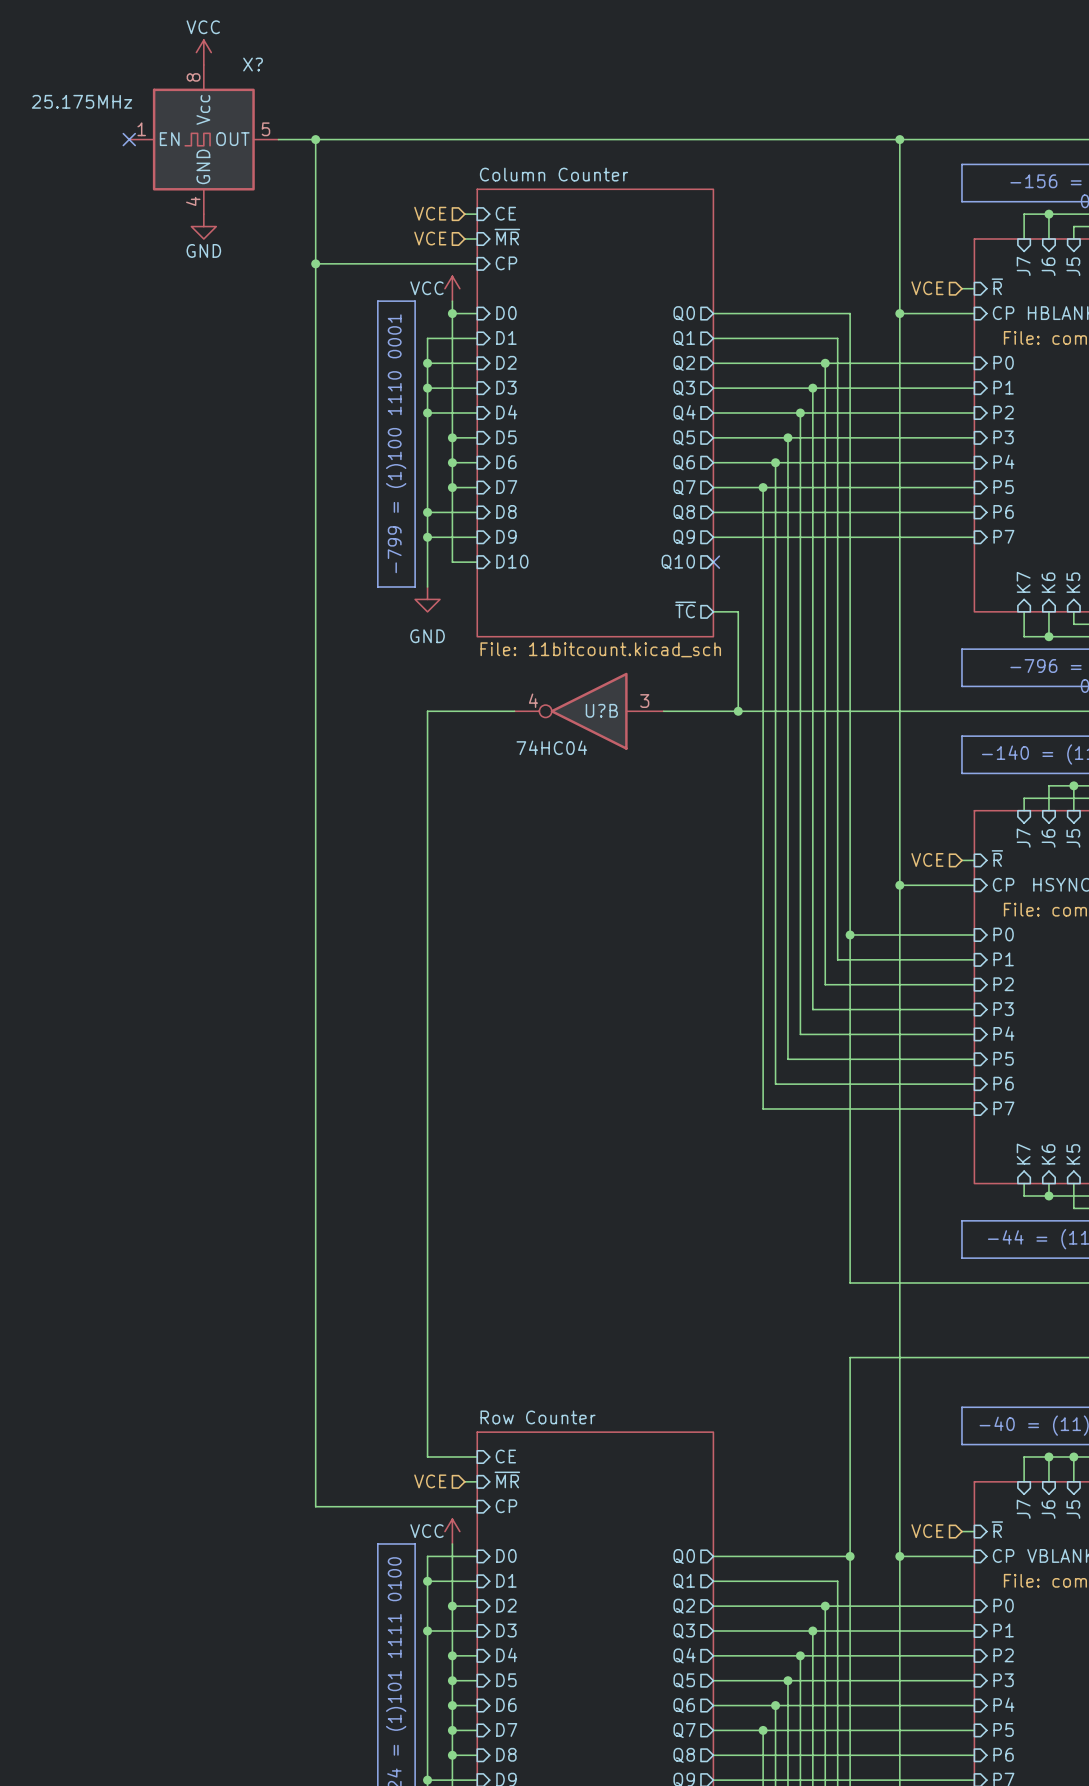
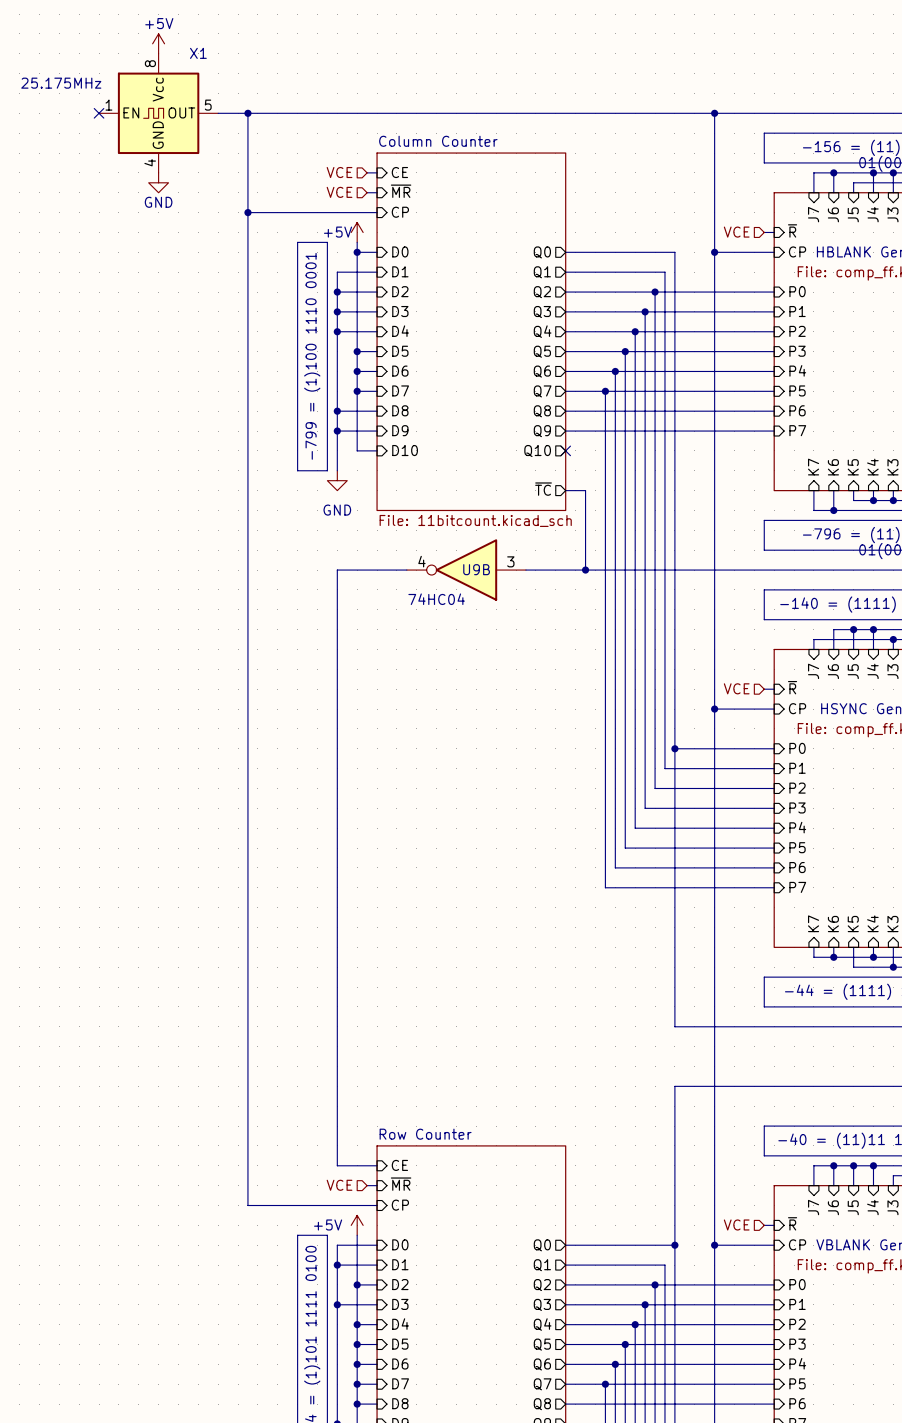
power symbol: VCC (203, 52) -> +5V (158, 43)
X? name: X? (253, 64) -> X1 (198, 53)
power symbol: VCC (452, 288) -> +5V (357, 232)
U?B name: U?B (601, 710) -> U9B (476, 569)
power symbol: VCC (452, 1531) -> +5V (357, 1225)

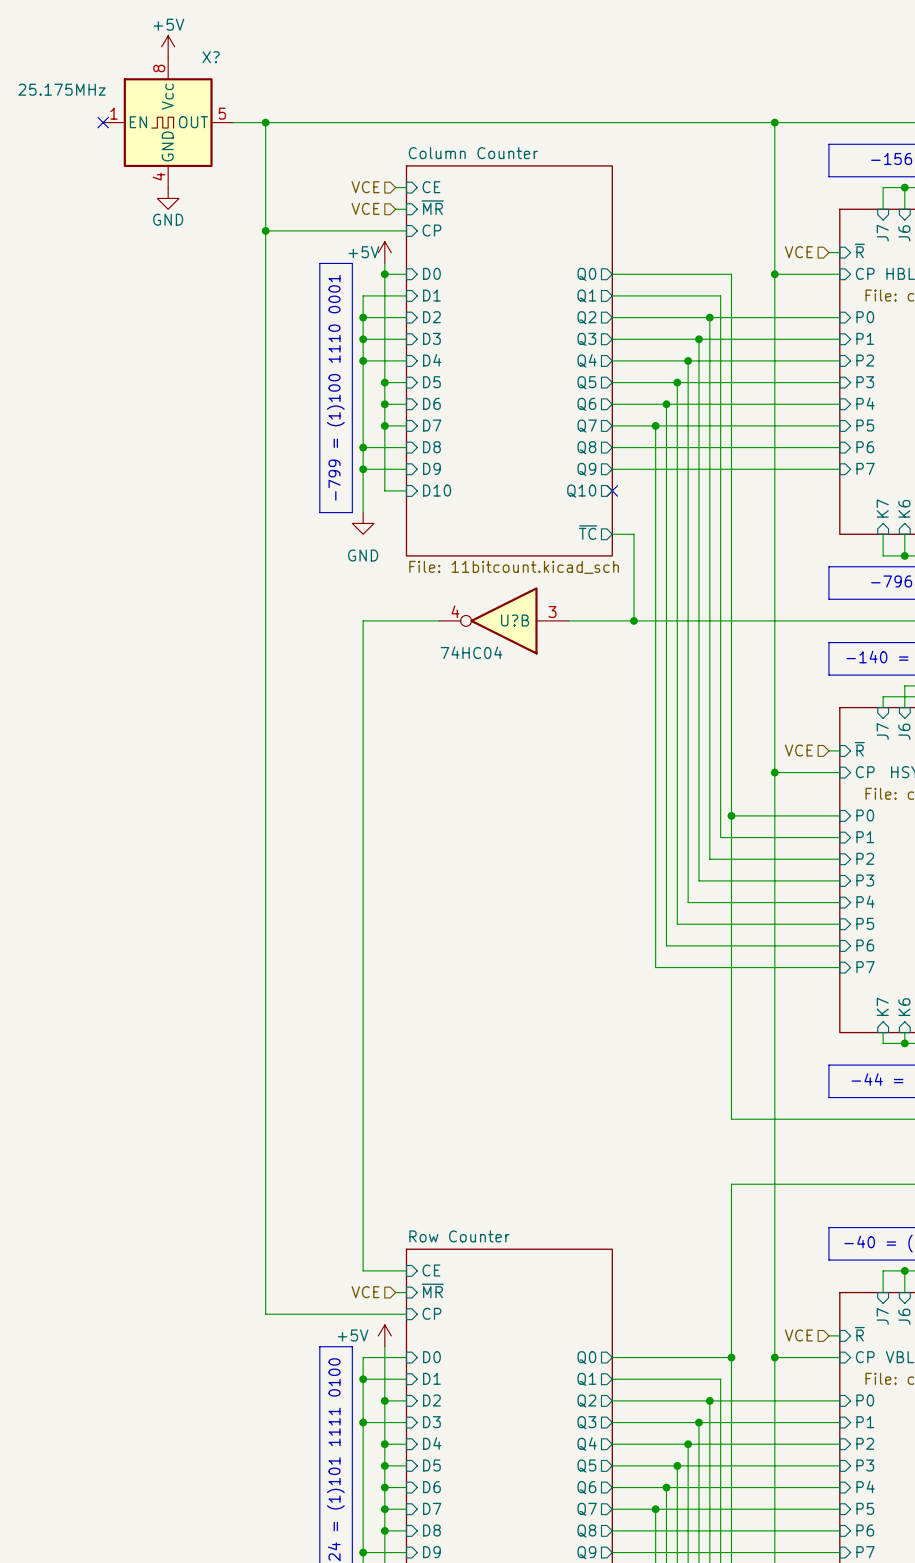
X1 name: X1 (198, 53) -> X? (211, 57)
U9B name: U9B (476, 569) -> U?B (515, 620)

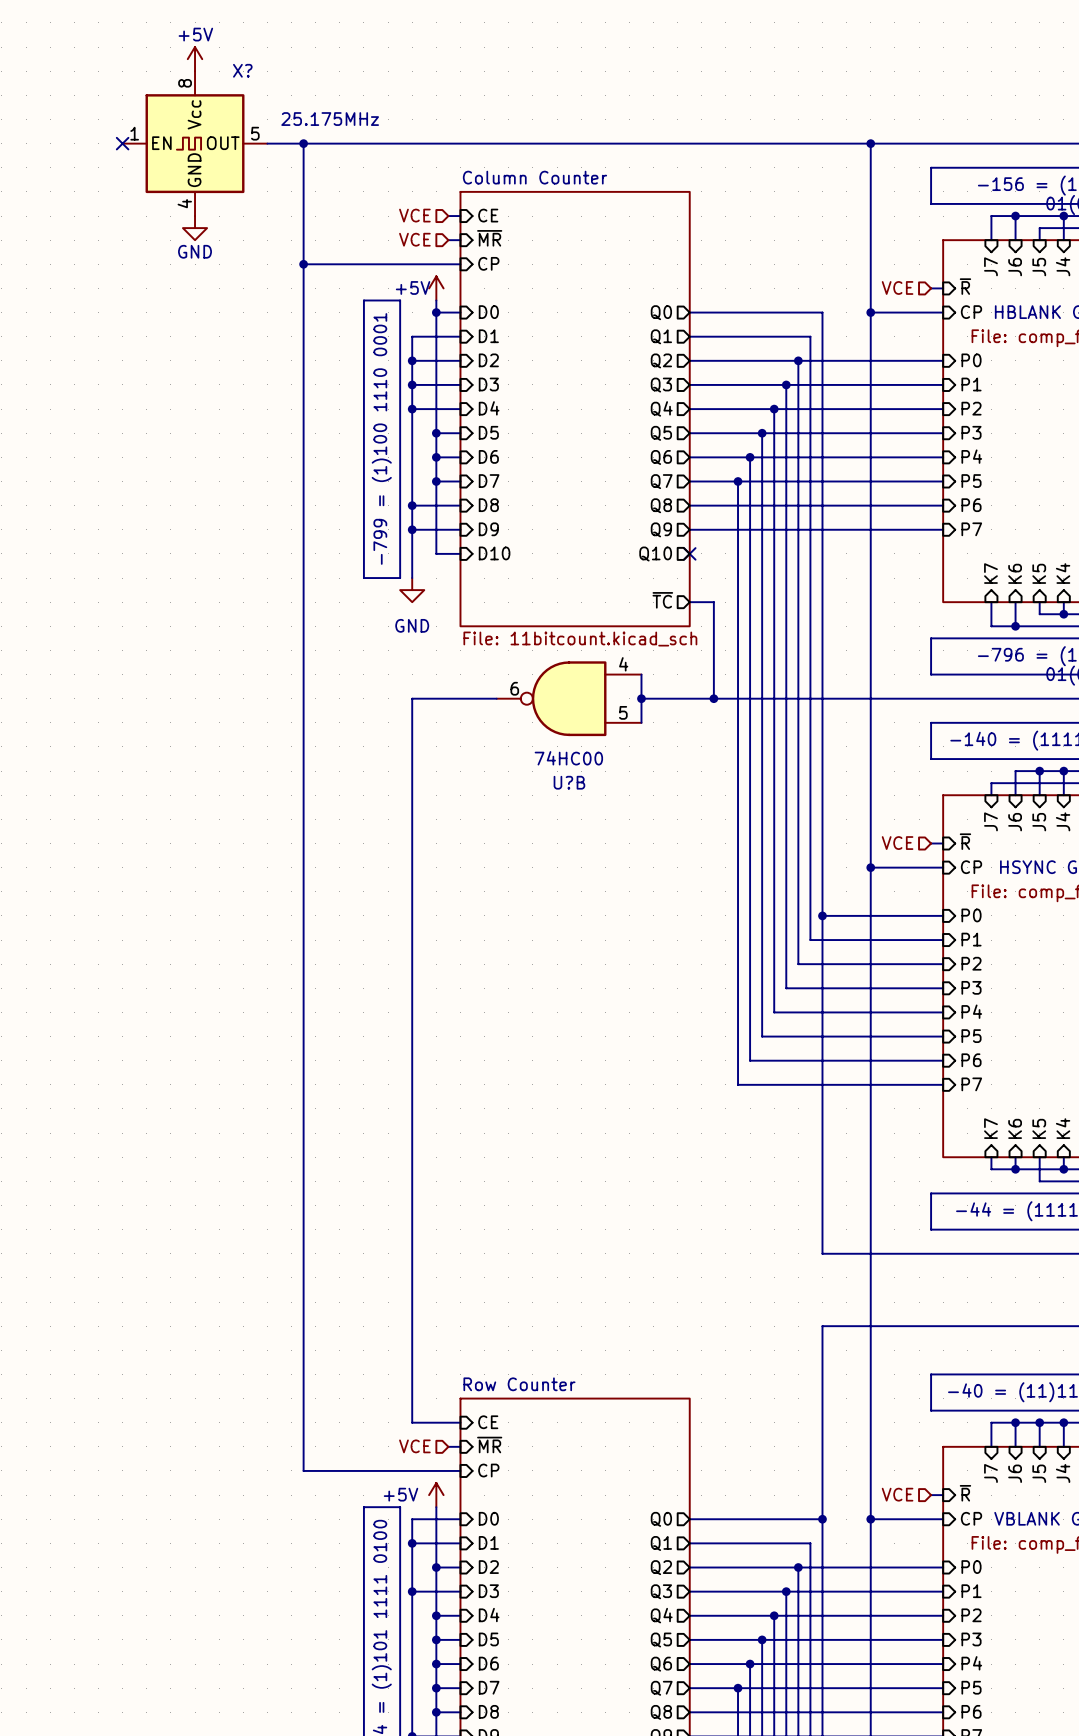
X? value position: 25.175MHz (61, 89) -> 25.175MHz (330, 119)
U?B symbol: [438, 587, 569, 655] -> [496, 661, 642, 737]
wire: none -> (641, 674) (641, 722)
U?B name position: U?B (515, 620) -> U?B (569, 782)
junction: none -> (641, 698)
U?B value: 74HC04 (471, 652) -> 74HC00 (568, 758)

